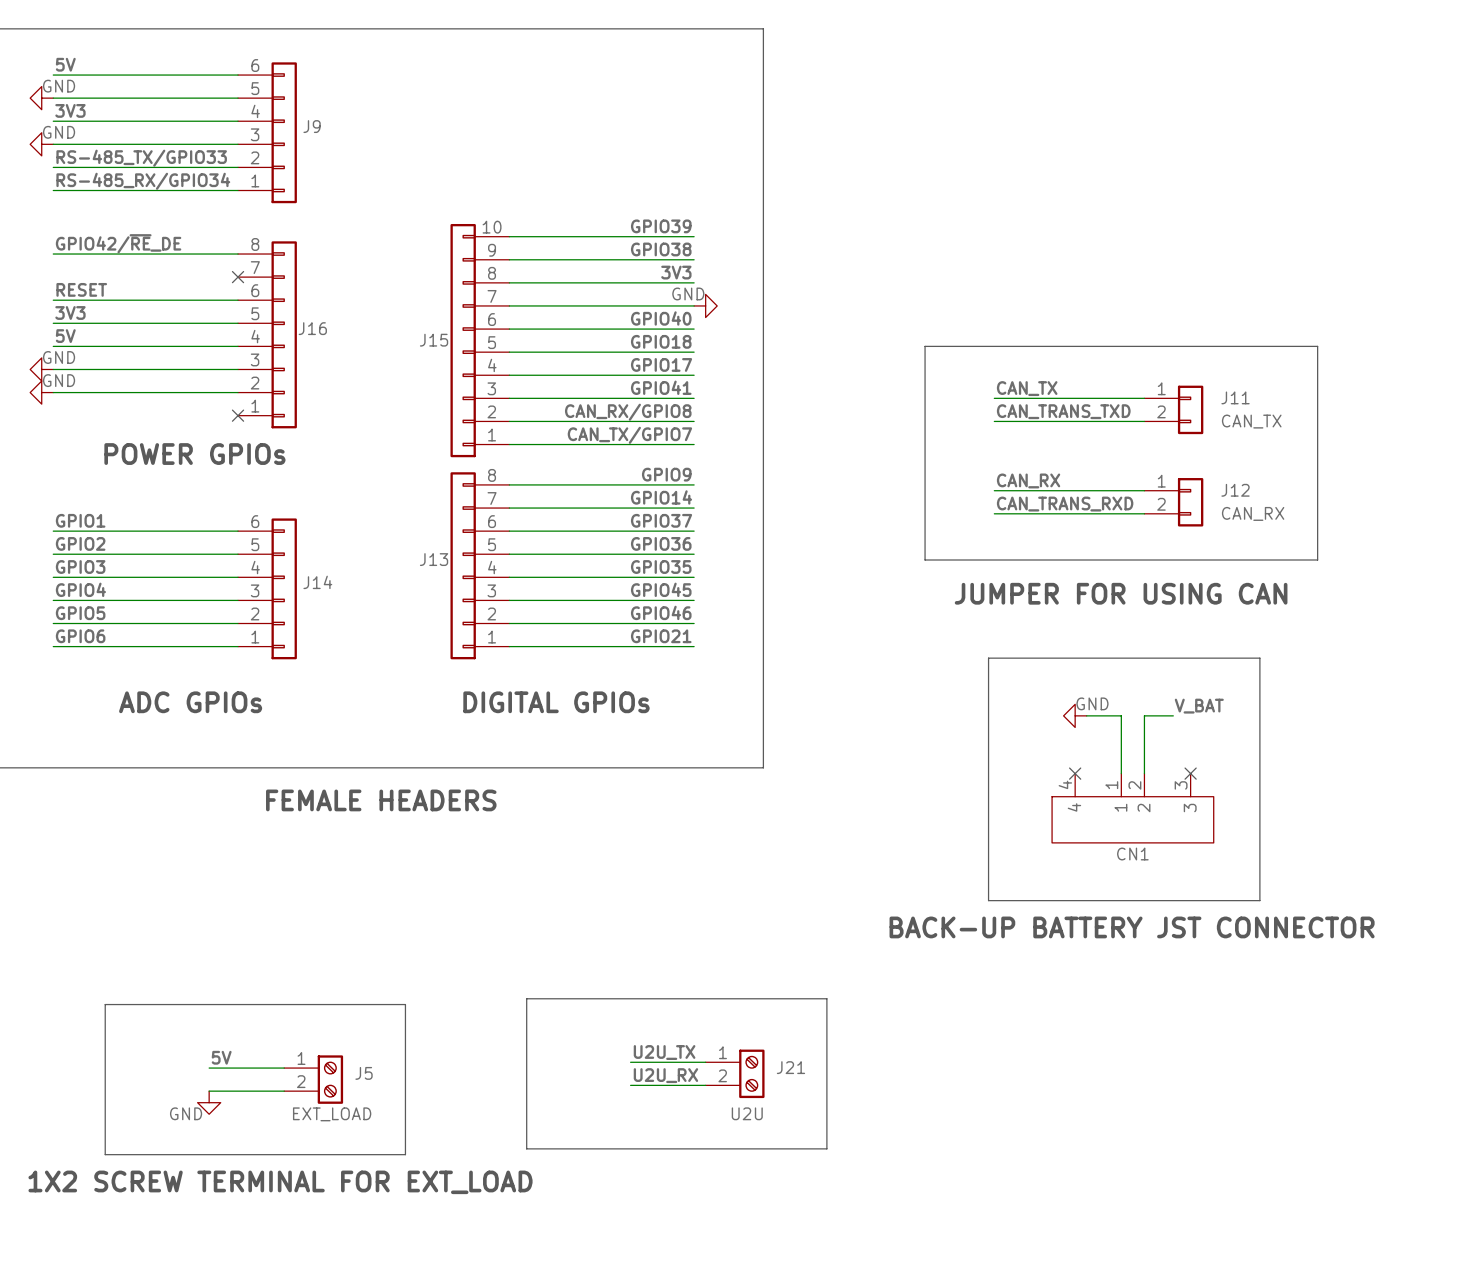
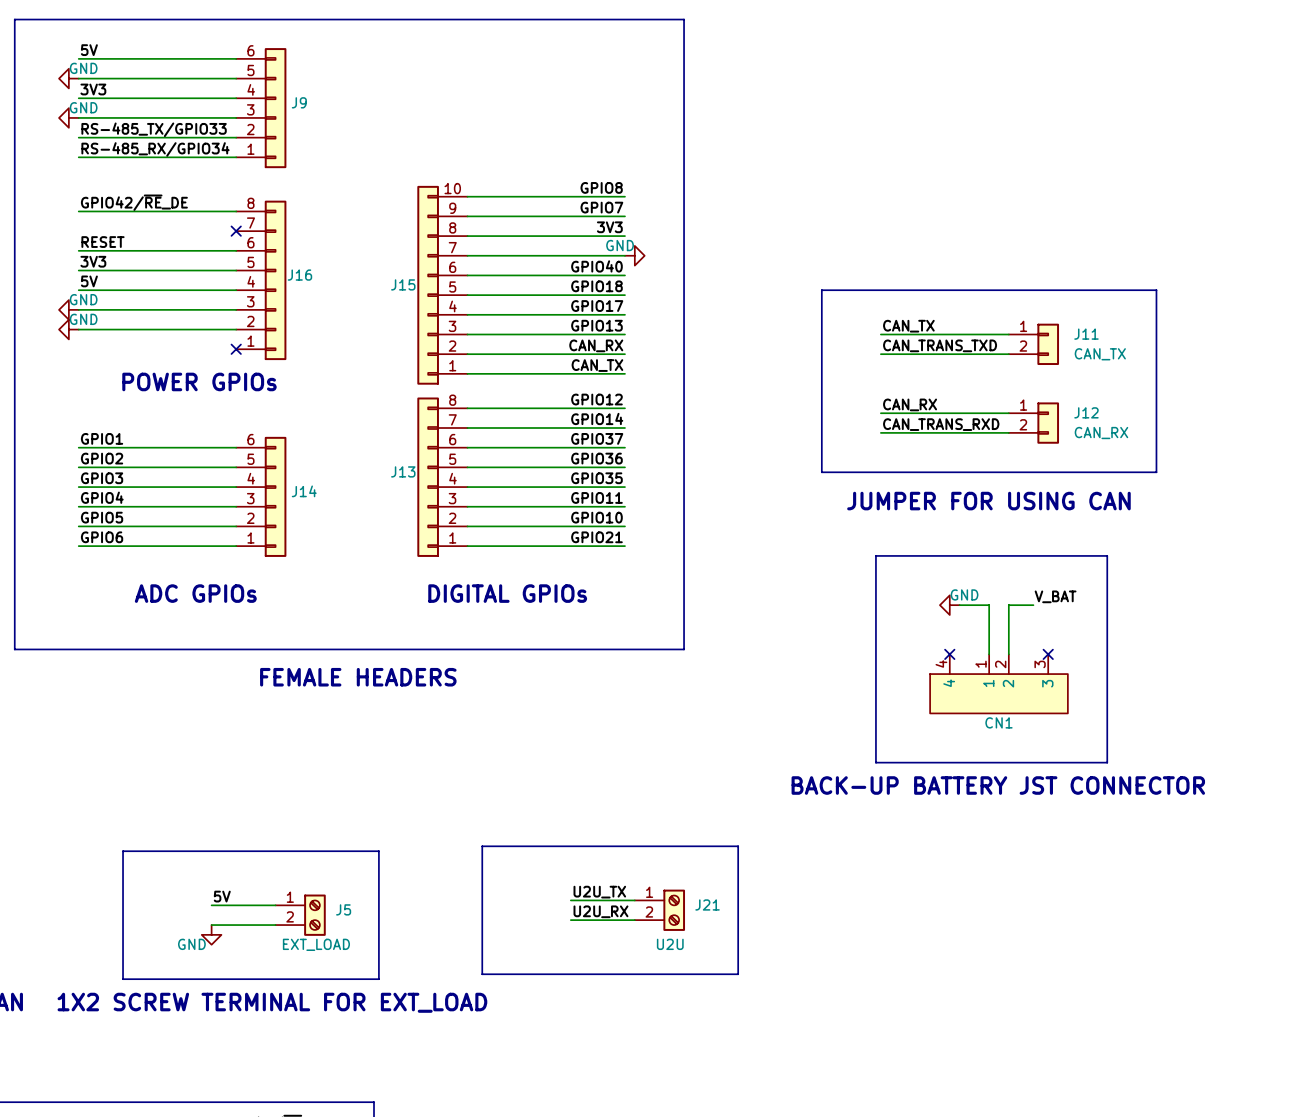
label: GPIO39 (661, 226) -> GPIO8 (601, 187)
label: GPIO38 (661, 249) -> GPIO7 (601, 207)
label: GPIO41 (661, 387) -> GPIO13 (596, 325)
label: CAN_RX/GPIO8 (628, 412) -> CAN_RX (596, 345)
label: CAN_TX/GPIO7 (629, 435) -> CAN_TX (597, 365)
label: GPIO9 (666, 474) -> GPIO12 (596, 399)
label: GPIO45 (661, 589) -> GPIO11 (596, 497)
label: GPIO46 (661, 612) -> GPIO10 (596, 517)

